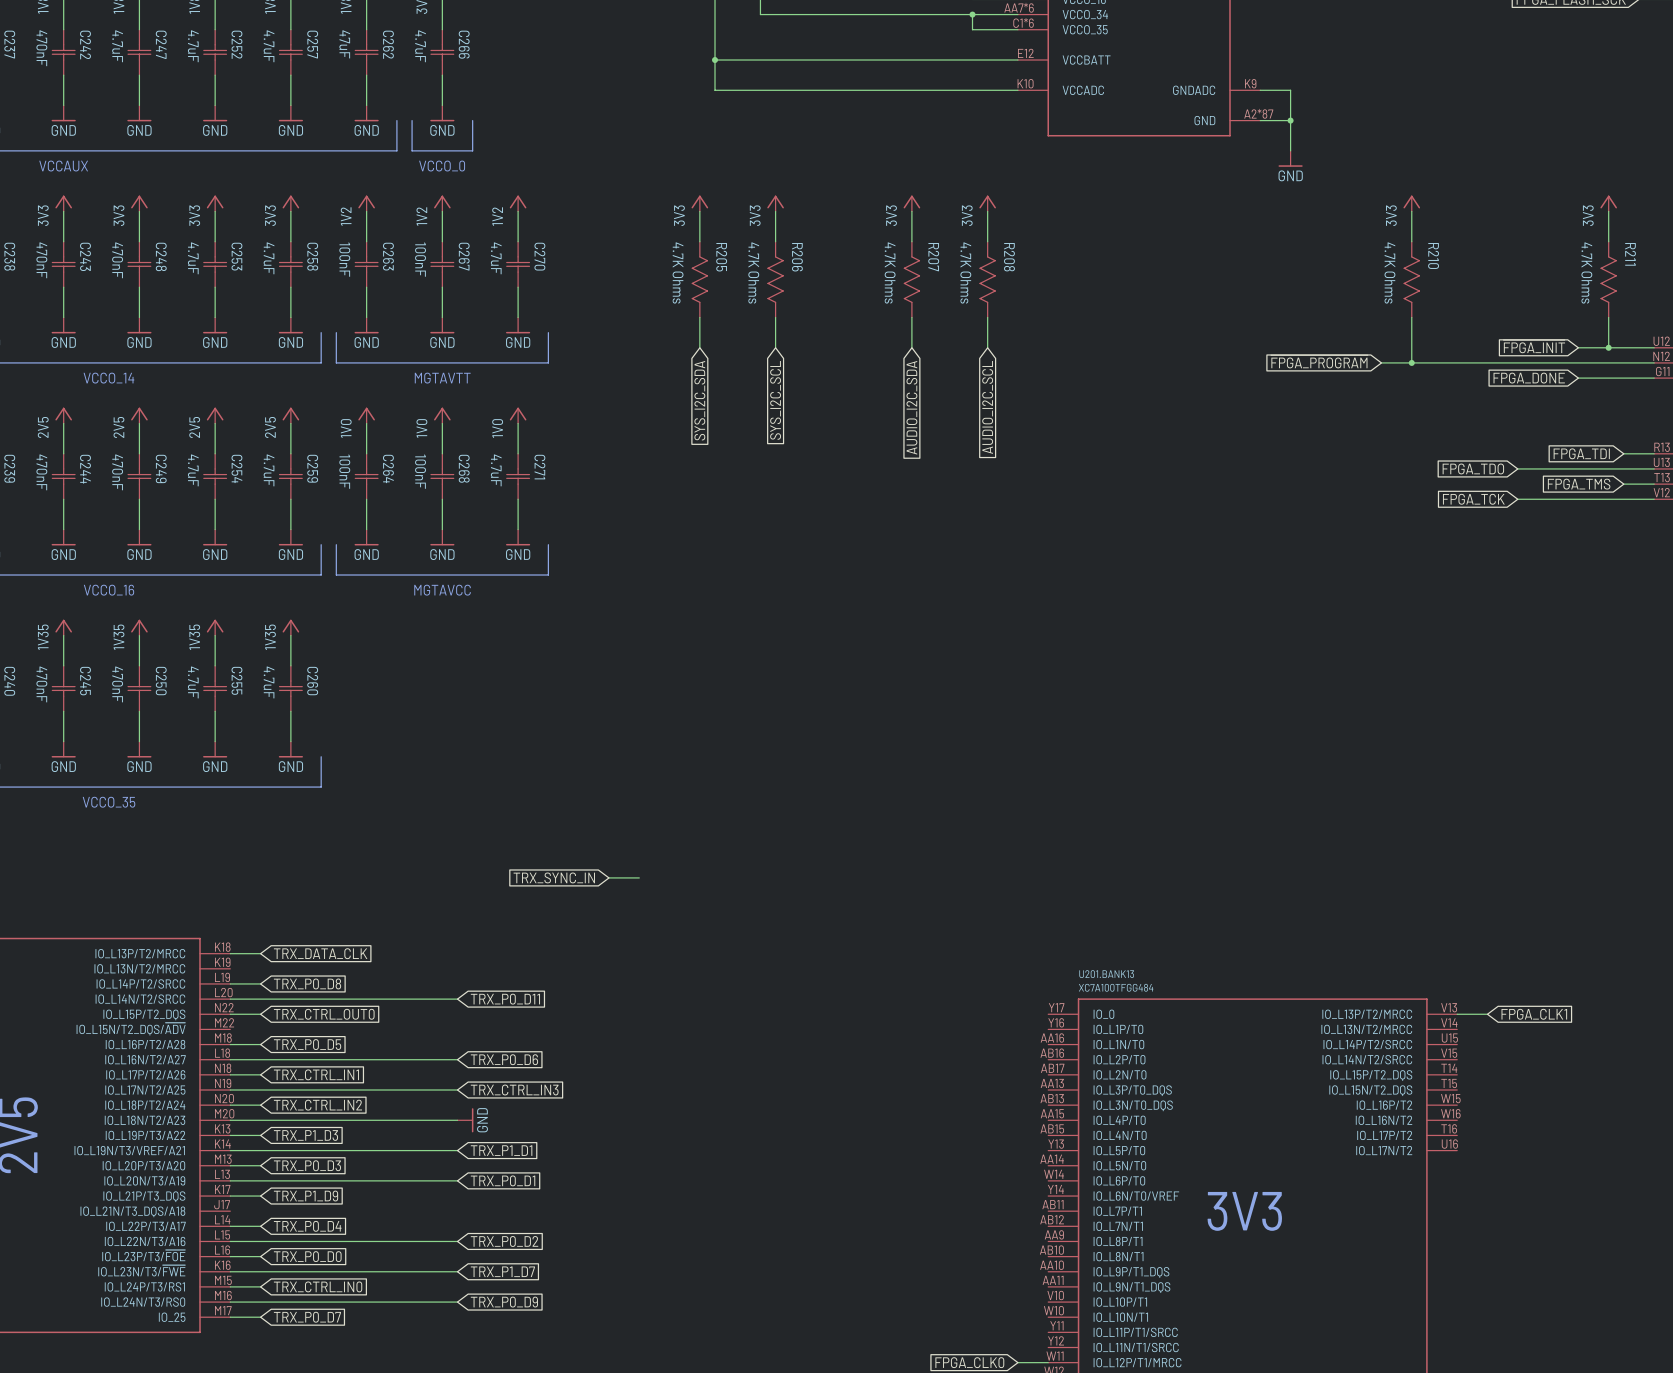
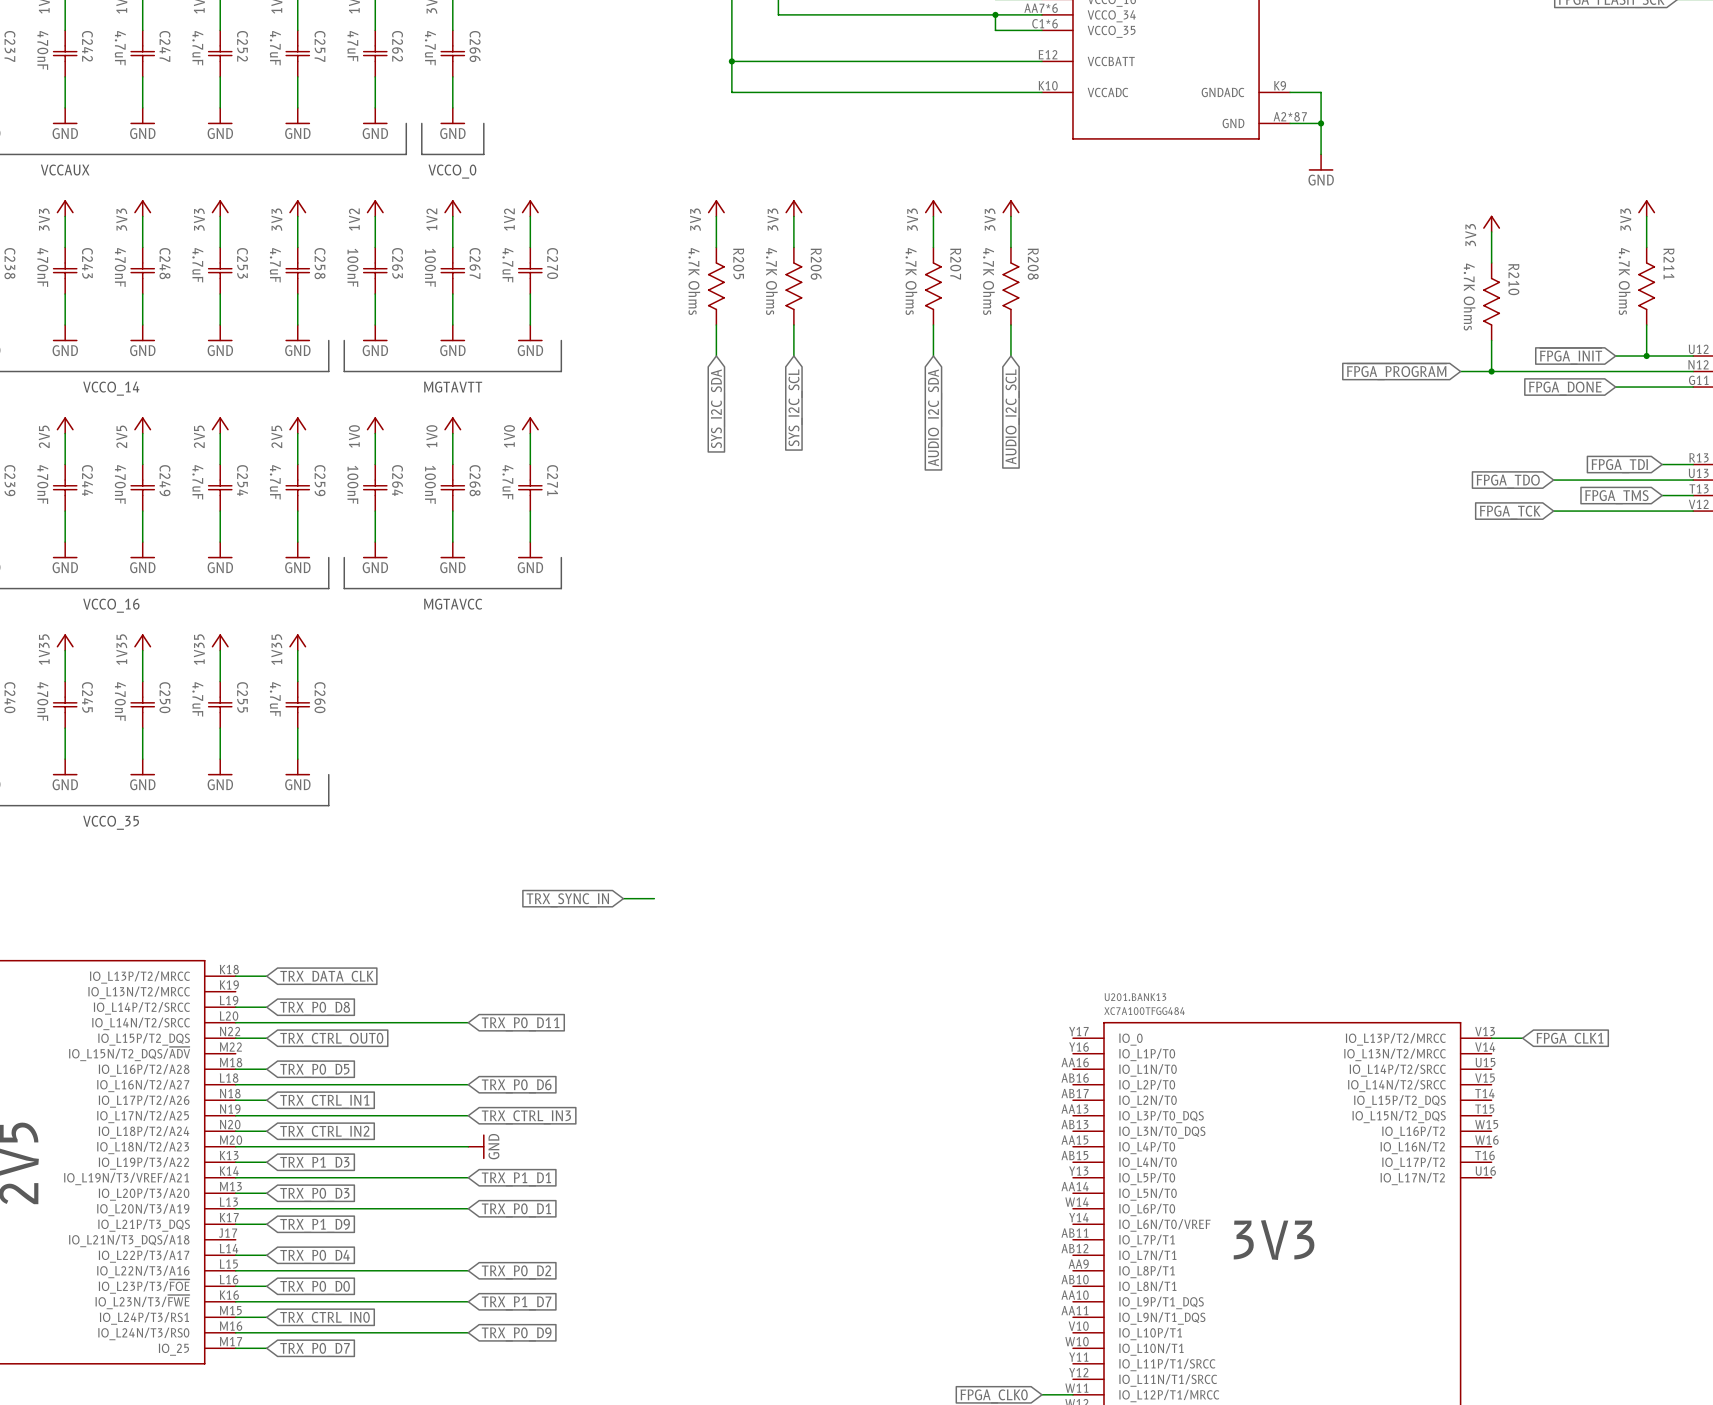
power symbol position: 3V3 (1411, 203) -> 3V3 (1491, 223)
wire: (1411, 211) (1411, 241) -> (1491, 231) (1491, 262)
R210 position: (1411, 279) -> (1491, 301)
wire: (1411, 317) (1411, 362) -> none
wire: none -> (1491, 340) (1491, 371)
global label position: ~{FPGA_PROGRAM} (1319, 361) -> ~{FPGA_PROGRAM} (1396, 371)
wire: (1381, 362) (1426, 362) -> none
junction: (1411, 362) -> none
junction: none -> (1491, 371)

